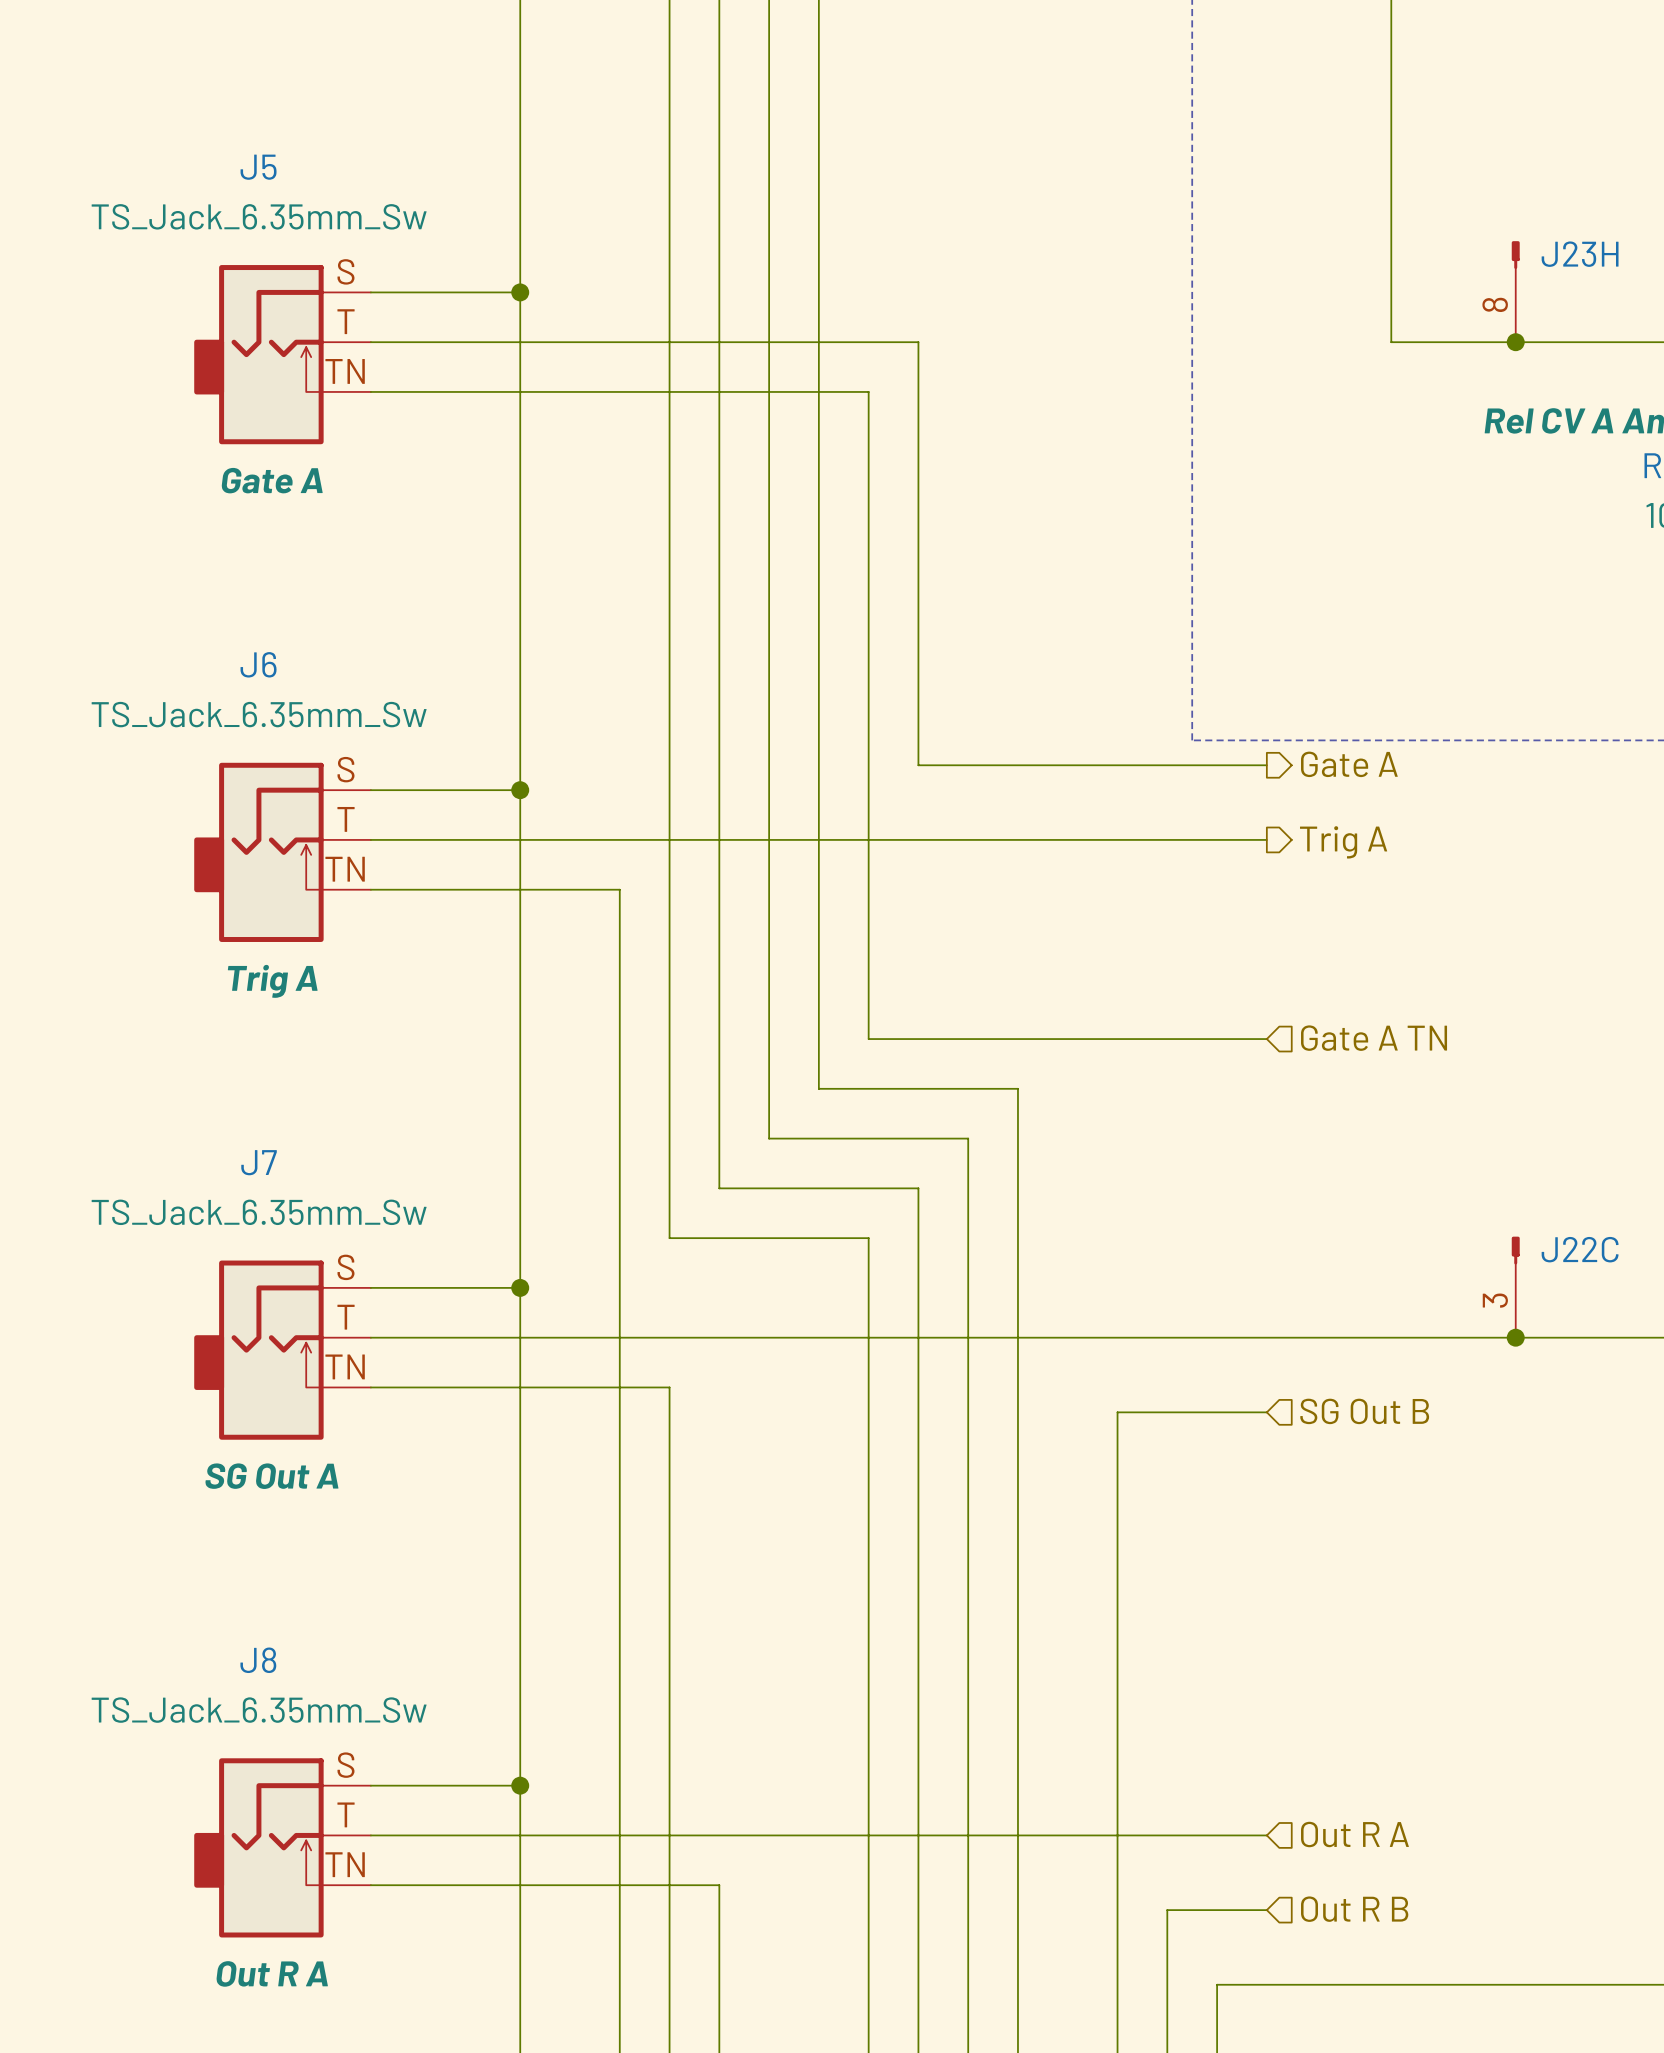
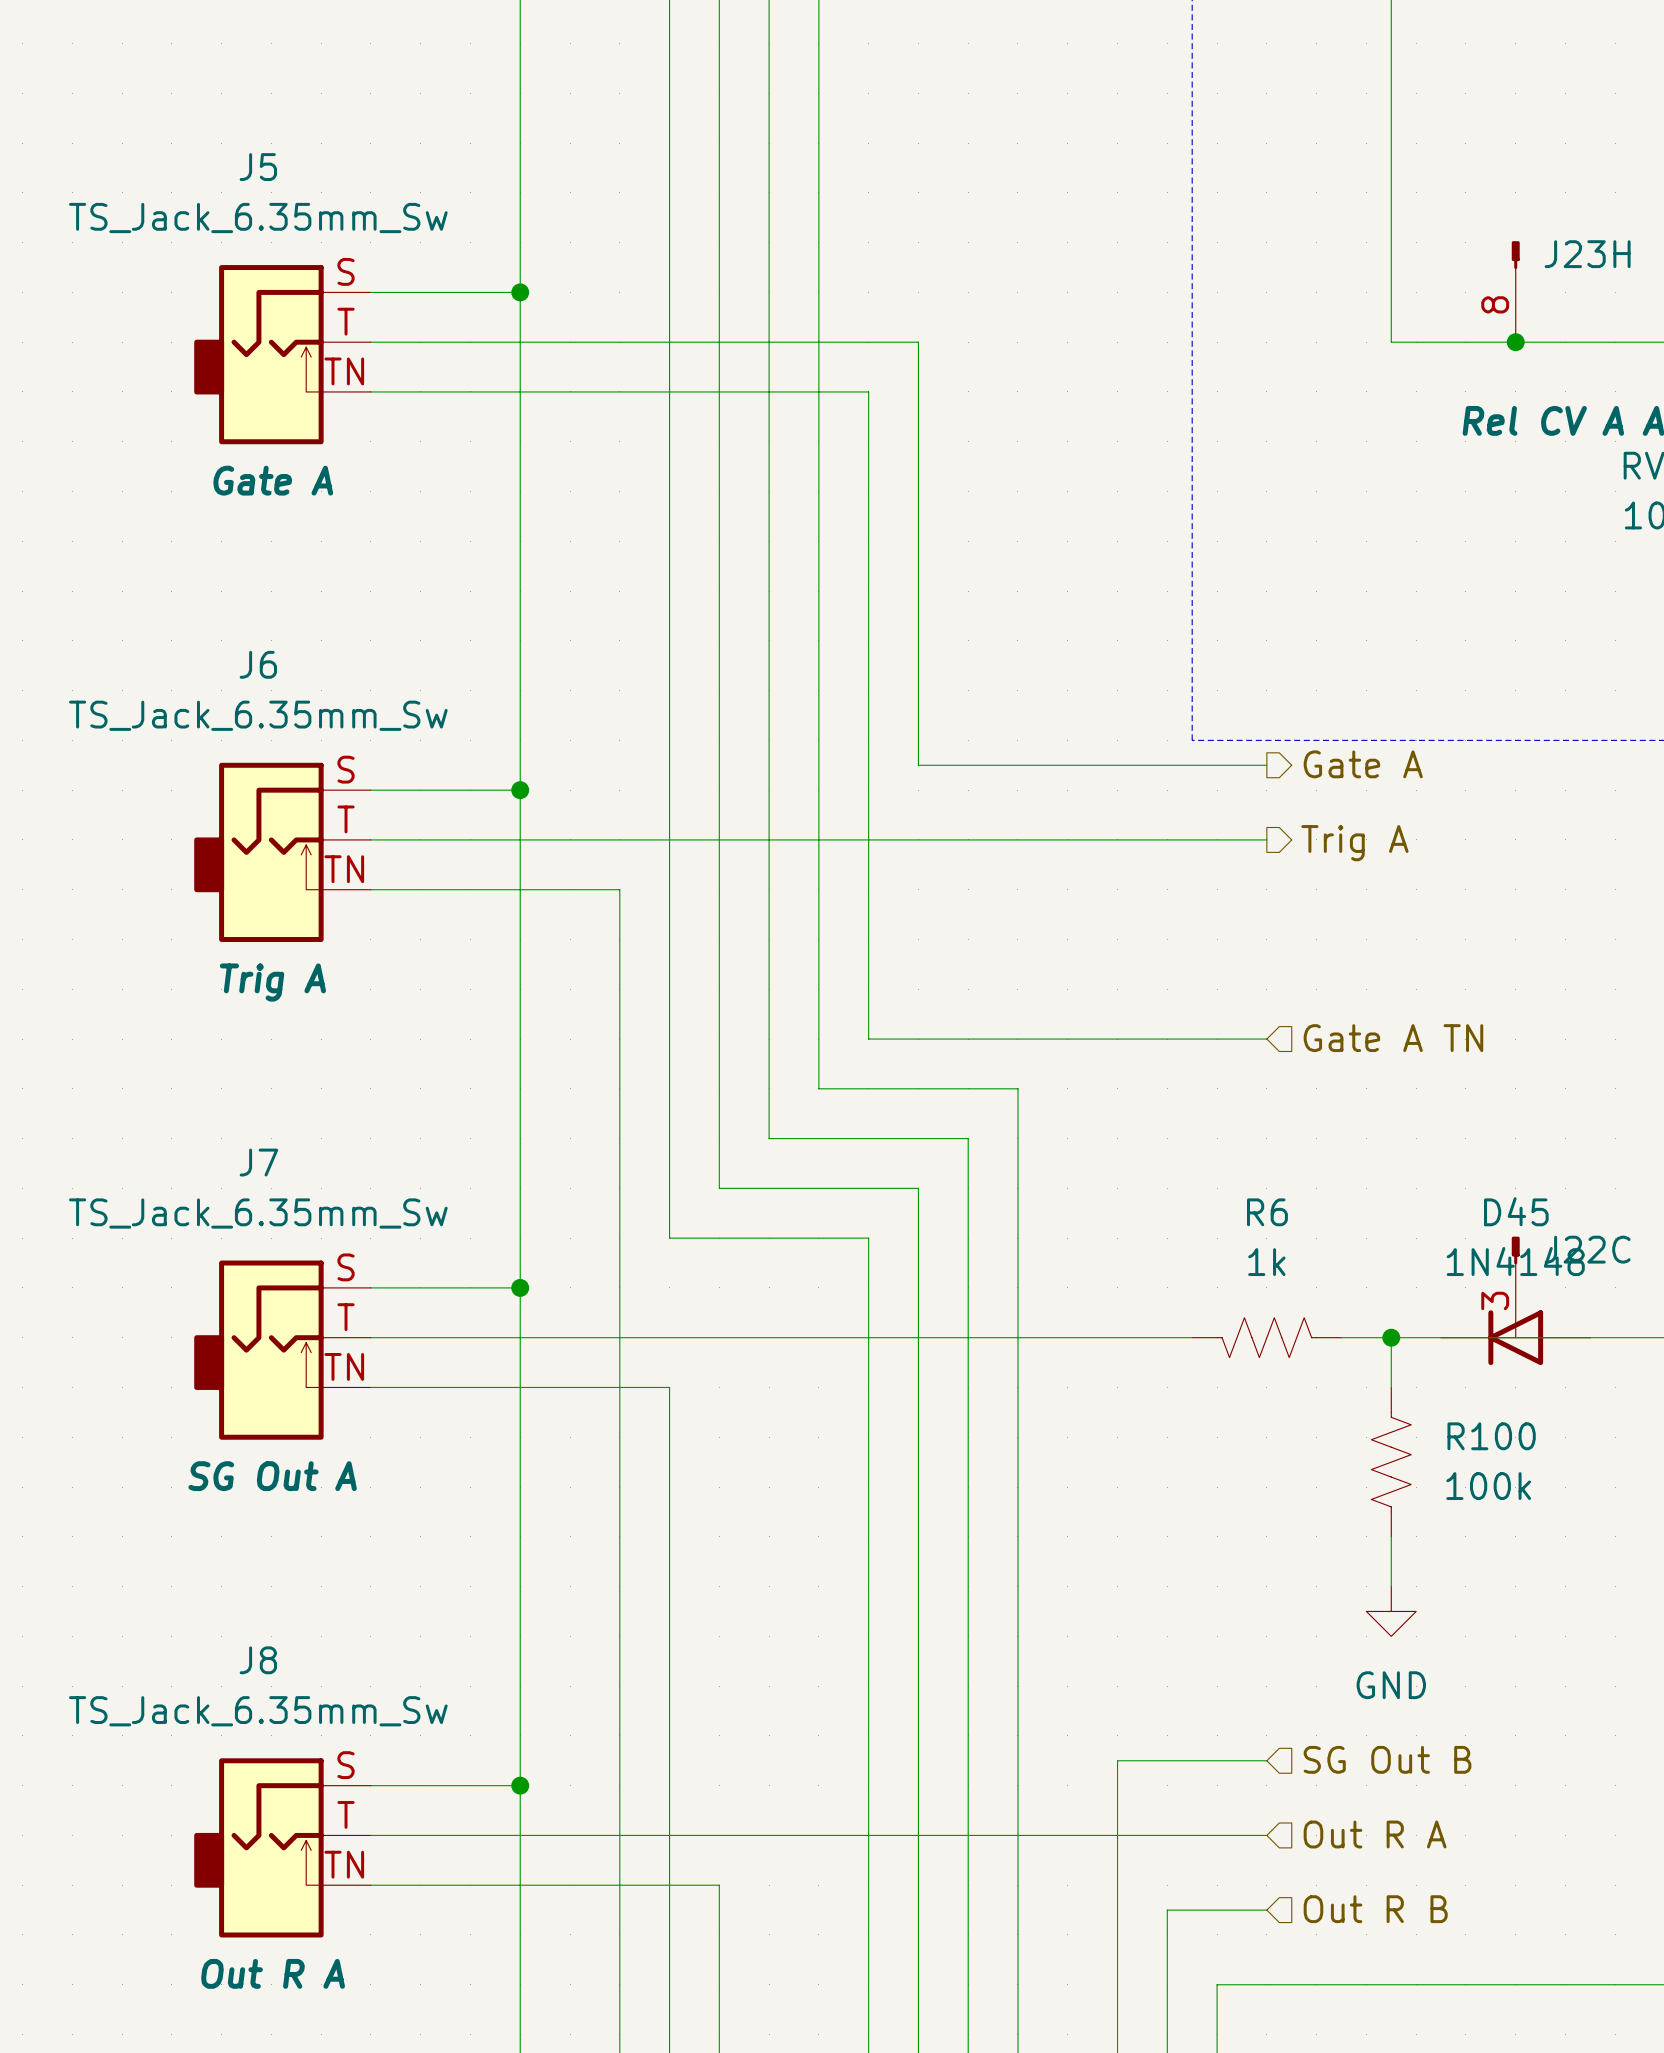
wire: (1192, 1337) (1341, 1337) -> none
R6: none -> 1k (1266, 1337)
wire: none -> (1391, 1337) (1391, 1387)
junction: none -> (1391, 1337)
junction: (1515, 1337) -> none
D45: none -> 1N4148 (1515, 1337)
hierarchical label position: SG Out B (1364, 1411) -> SG Out B (1387, 1759)
wire: (1266, 1412) (1117, 1412) (1117, 1760) -> (1266, 1760) (1117, 1760)
R100: none -> 100k (1391, 1462)
wire: none -> (1391, 1536) (1391, 1586)
power symbol: none -> GND (1391, 1611)

